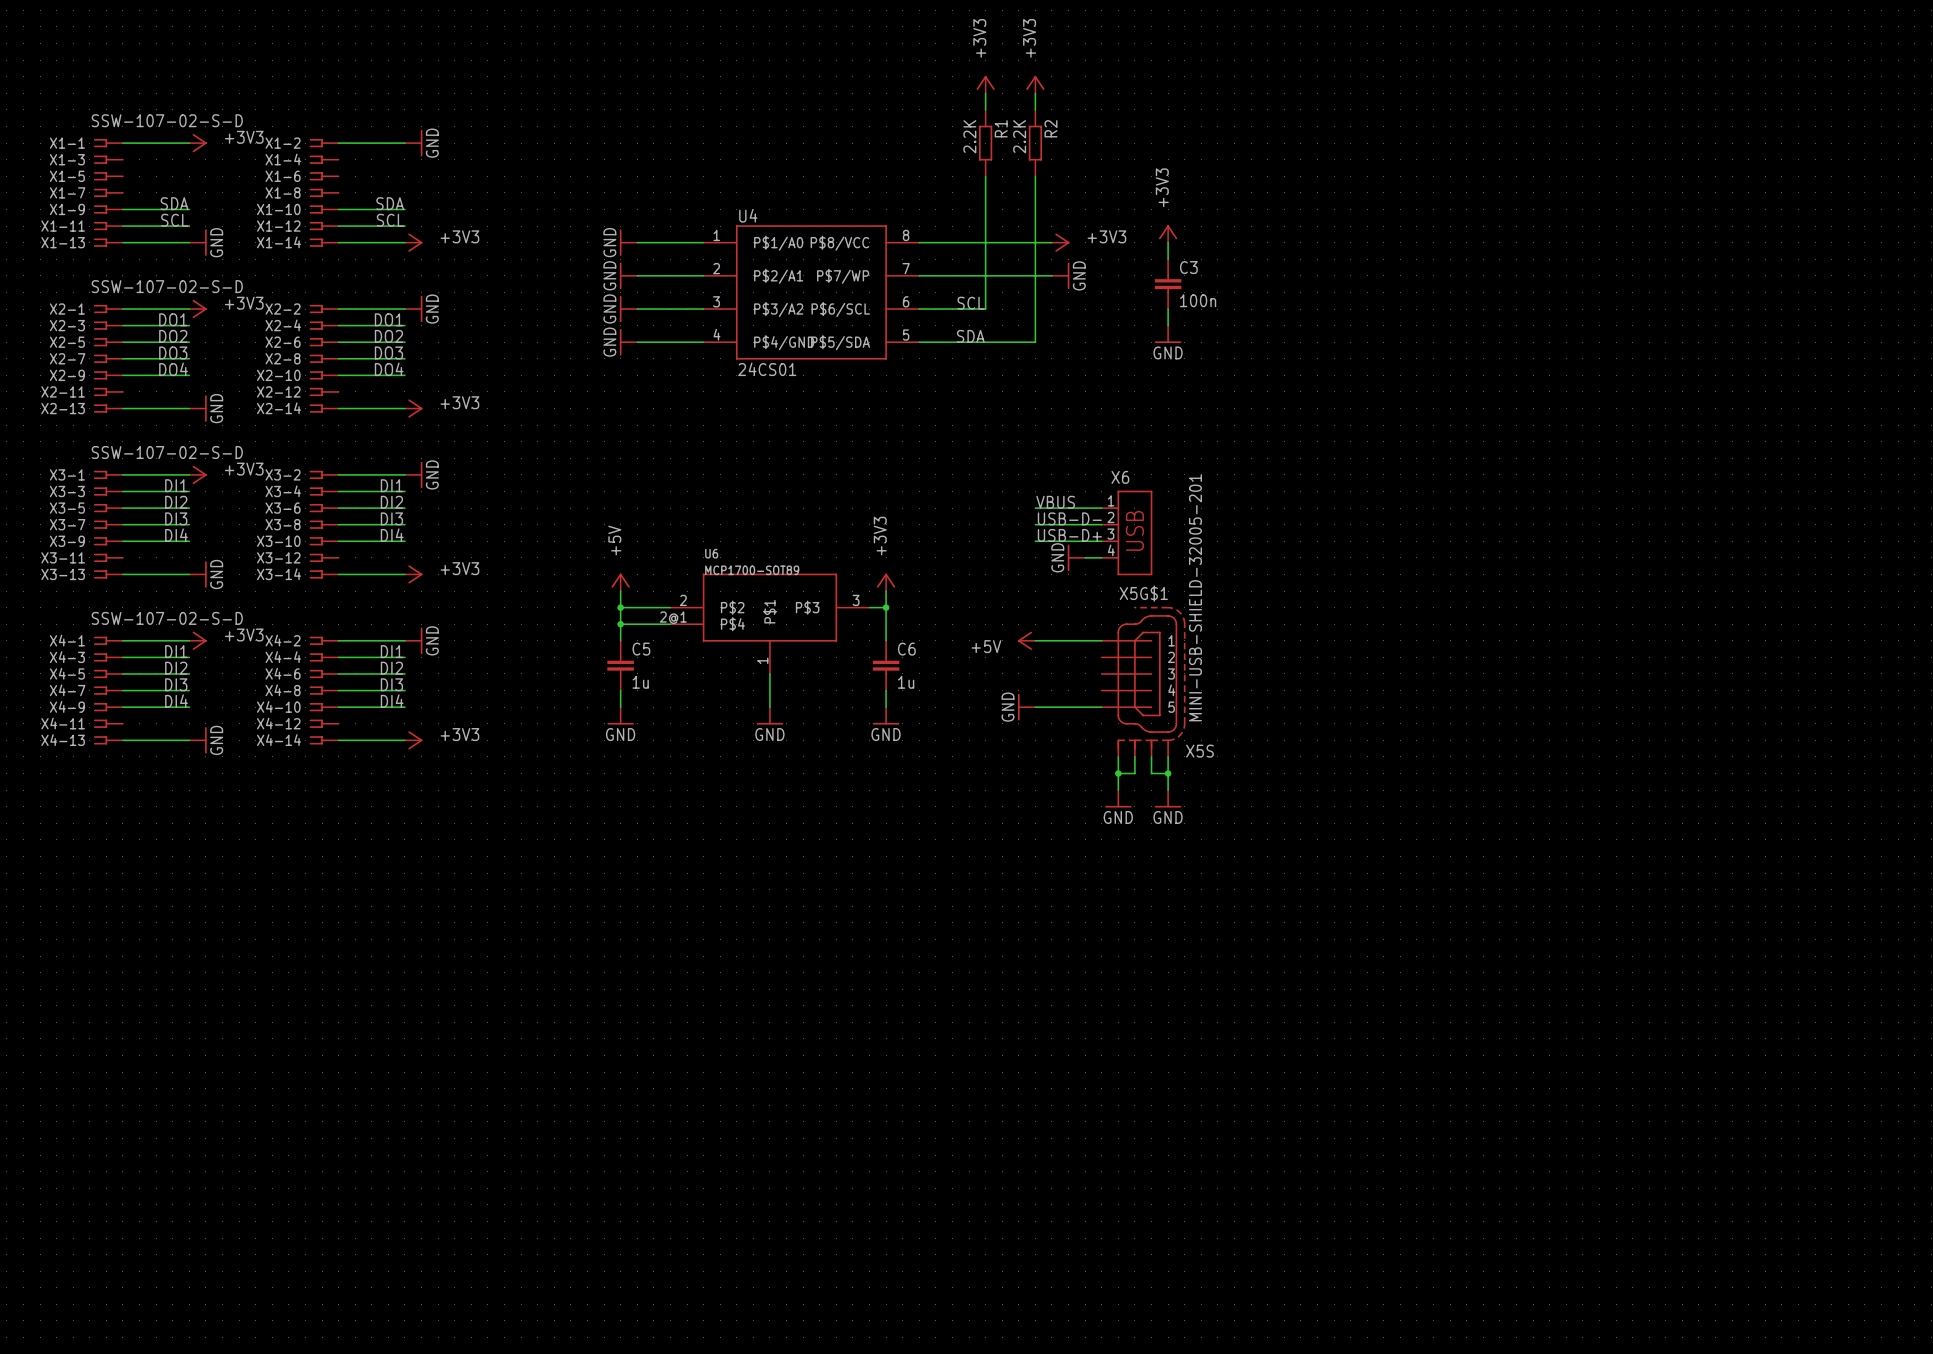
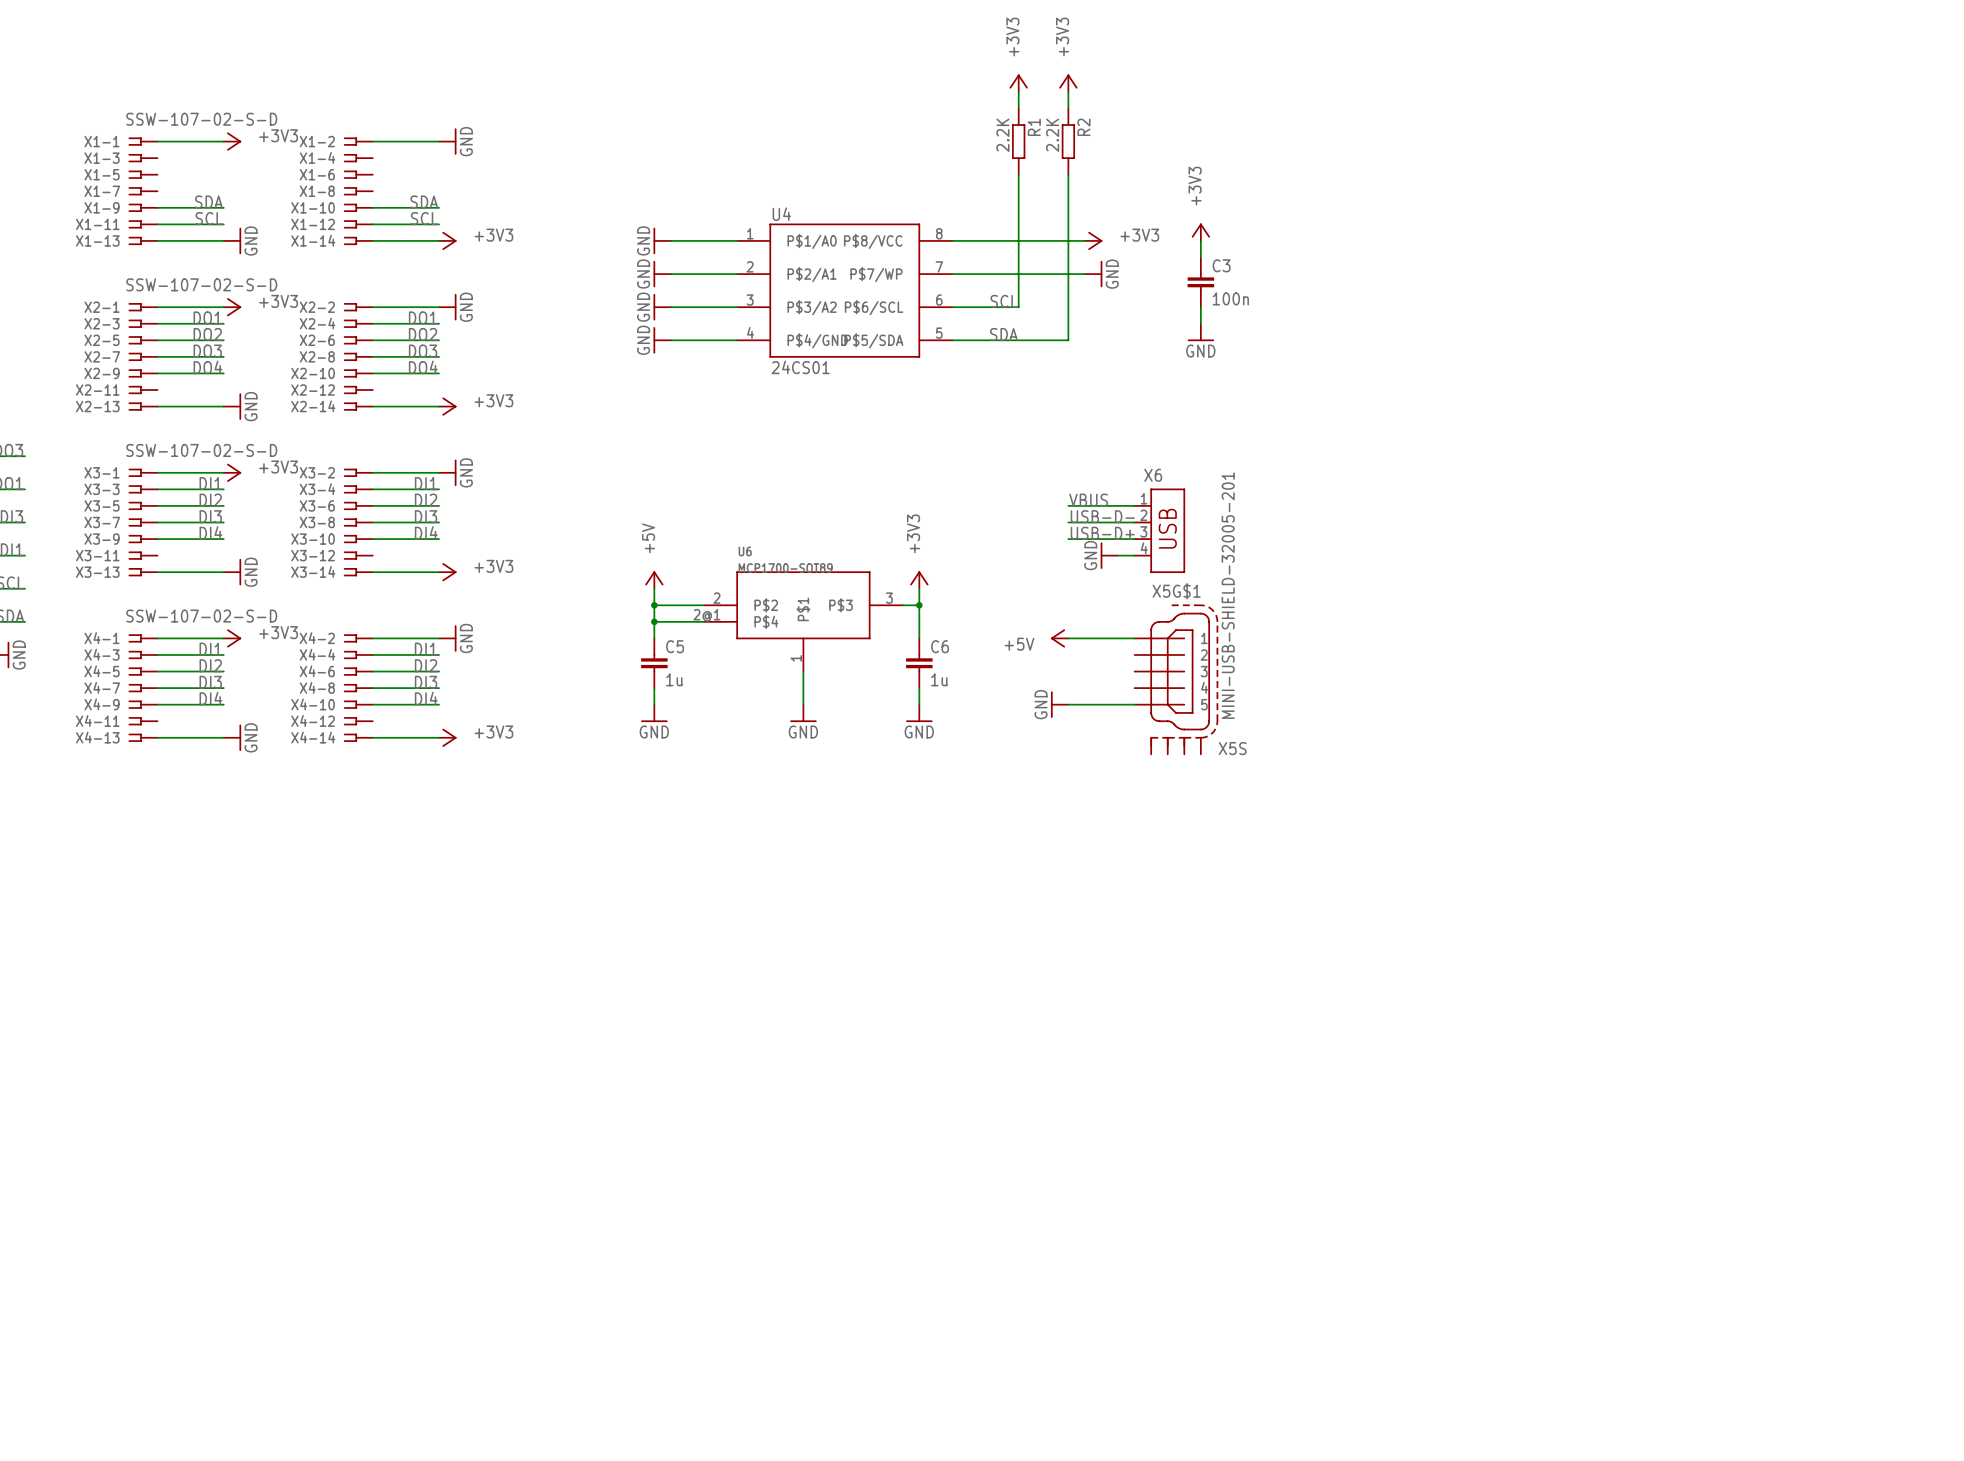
wire: (1118, 756) (1118, 790) -> none
wire: (1134, 756) (1134, 773) (1118, 773) -> none
wire: (1151, 756) (1151, 773) (1168, 773) -> none
wire: (1168, 756) (1168, 790) -> none
junction: (1118, 773) -> none
junction: (1168, 773) -> none
power symbol: GND (1118, 798) -> none
power symbol: GND (1168, 798) -> none

